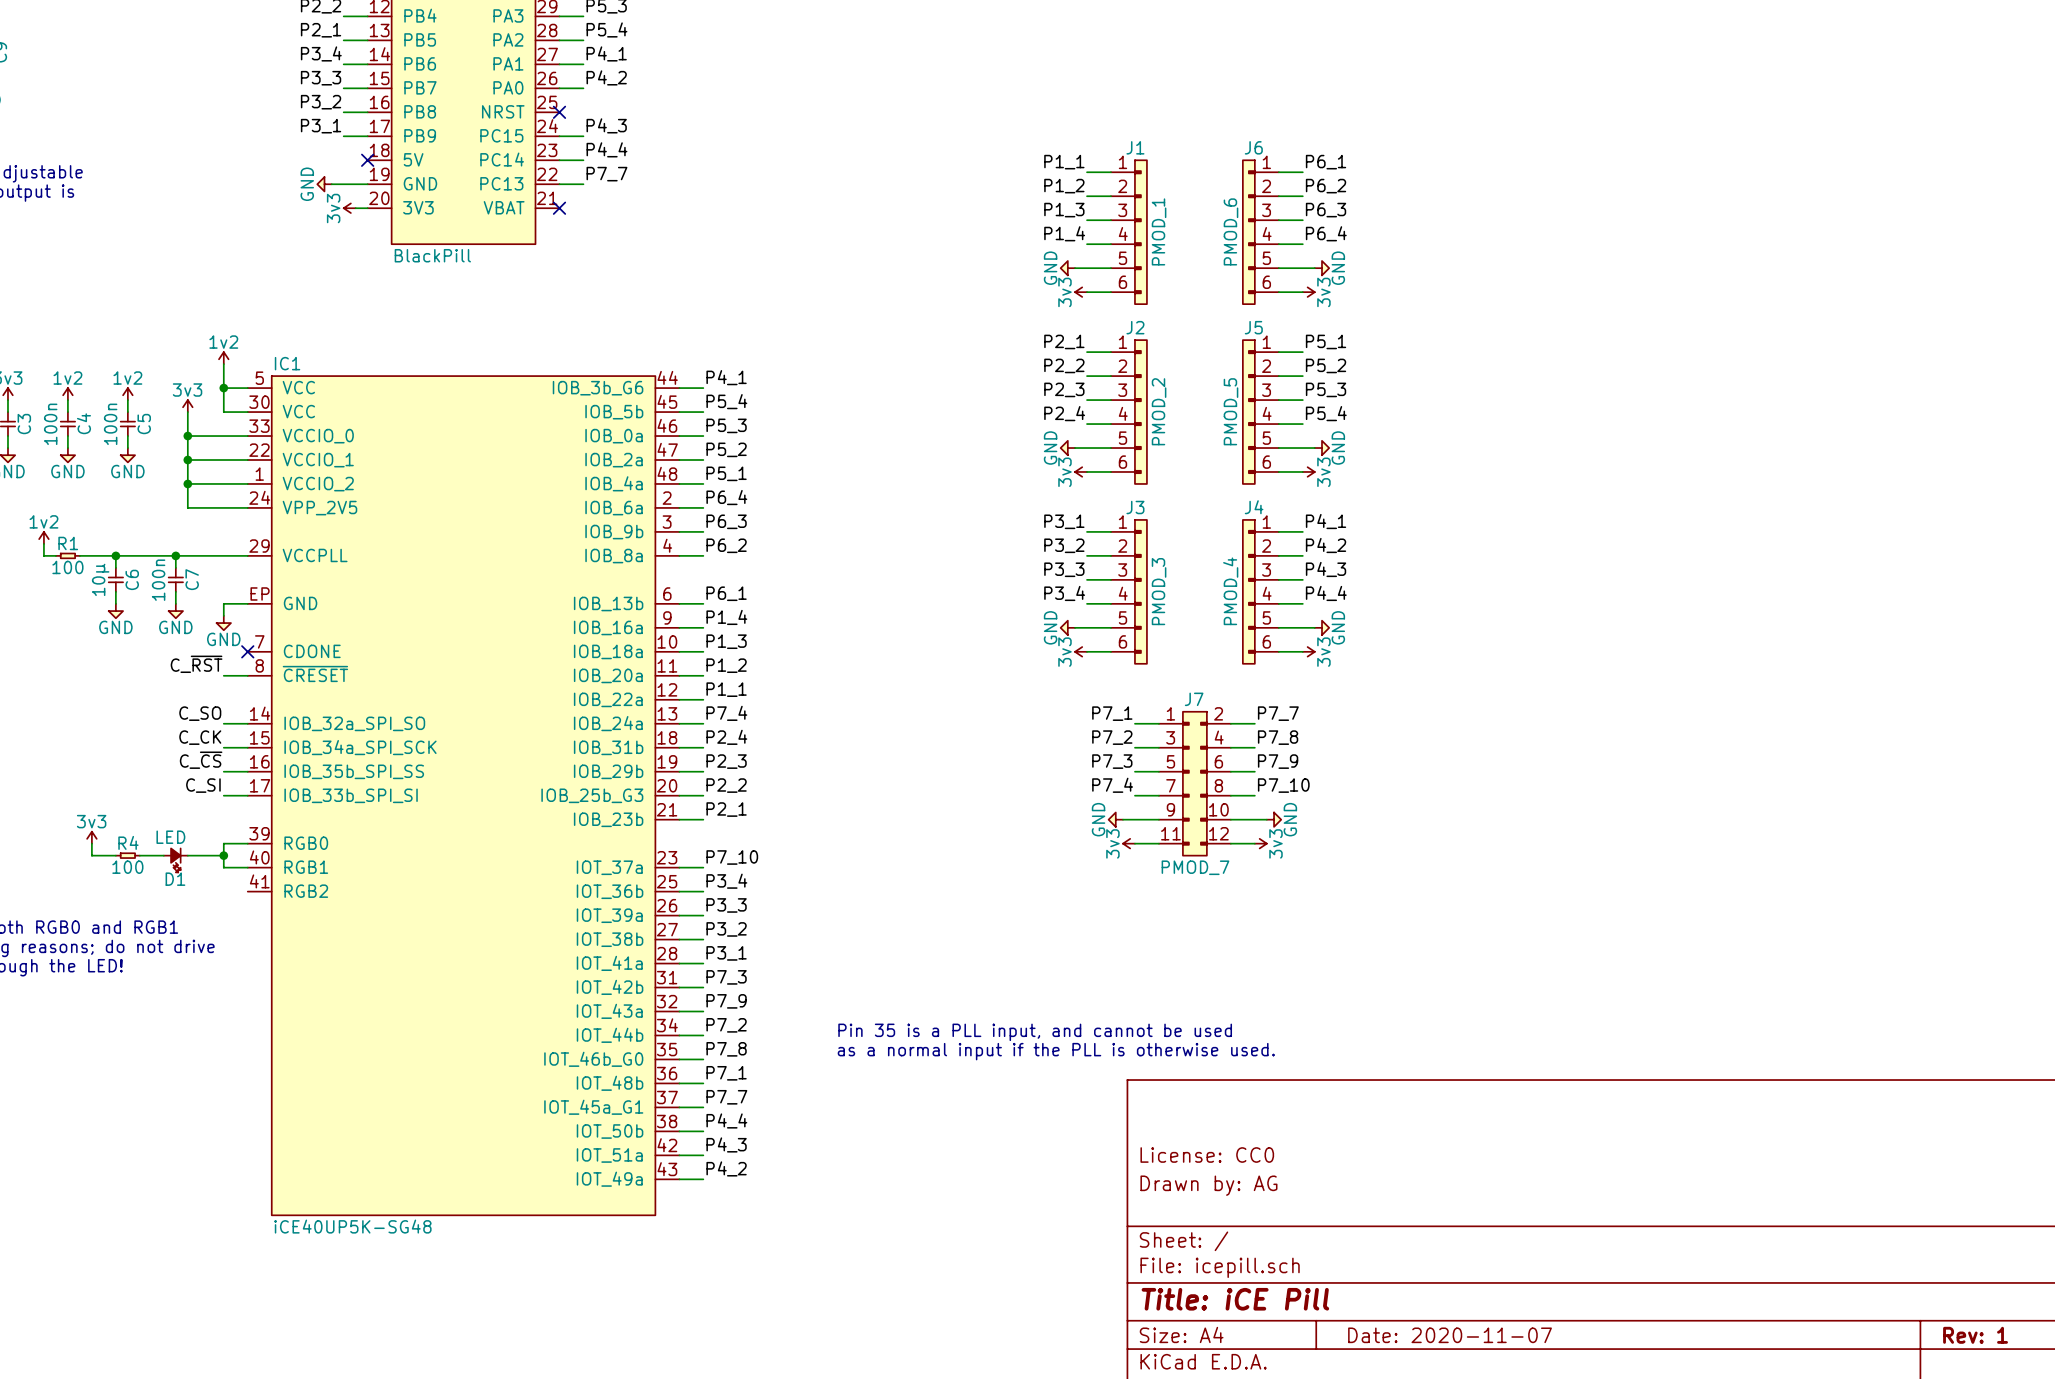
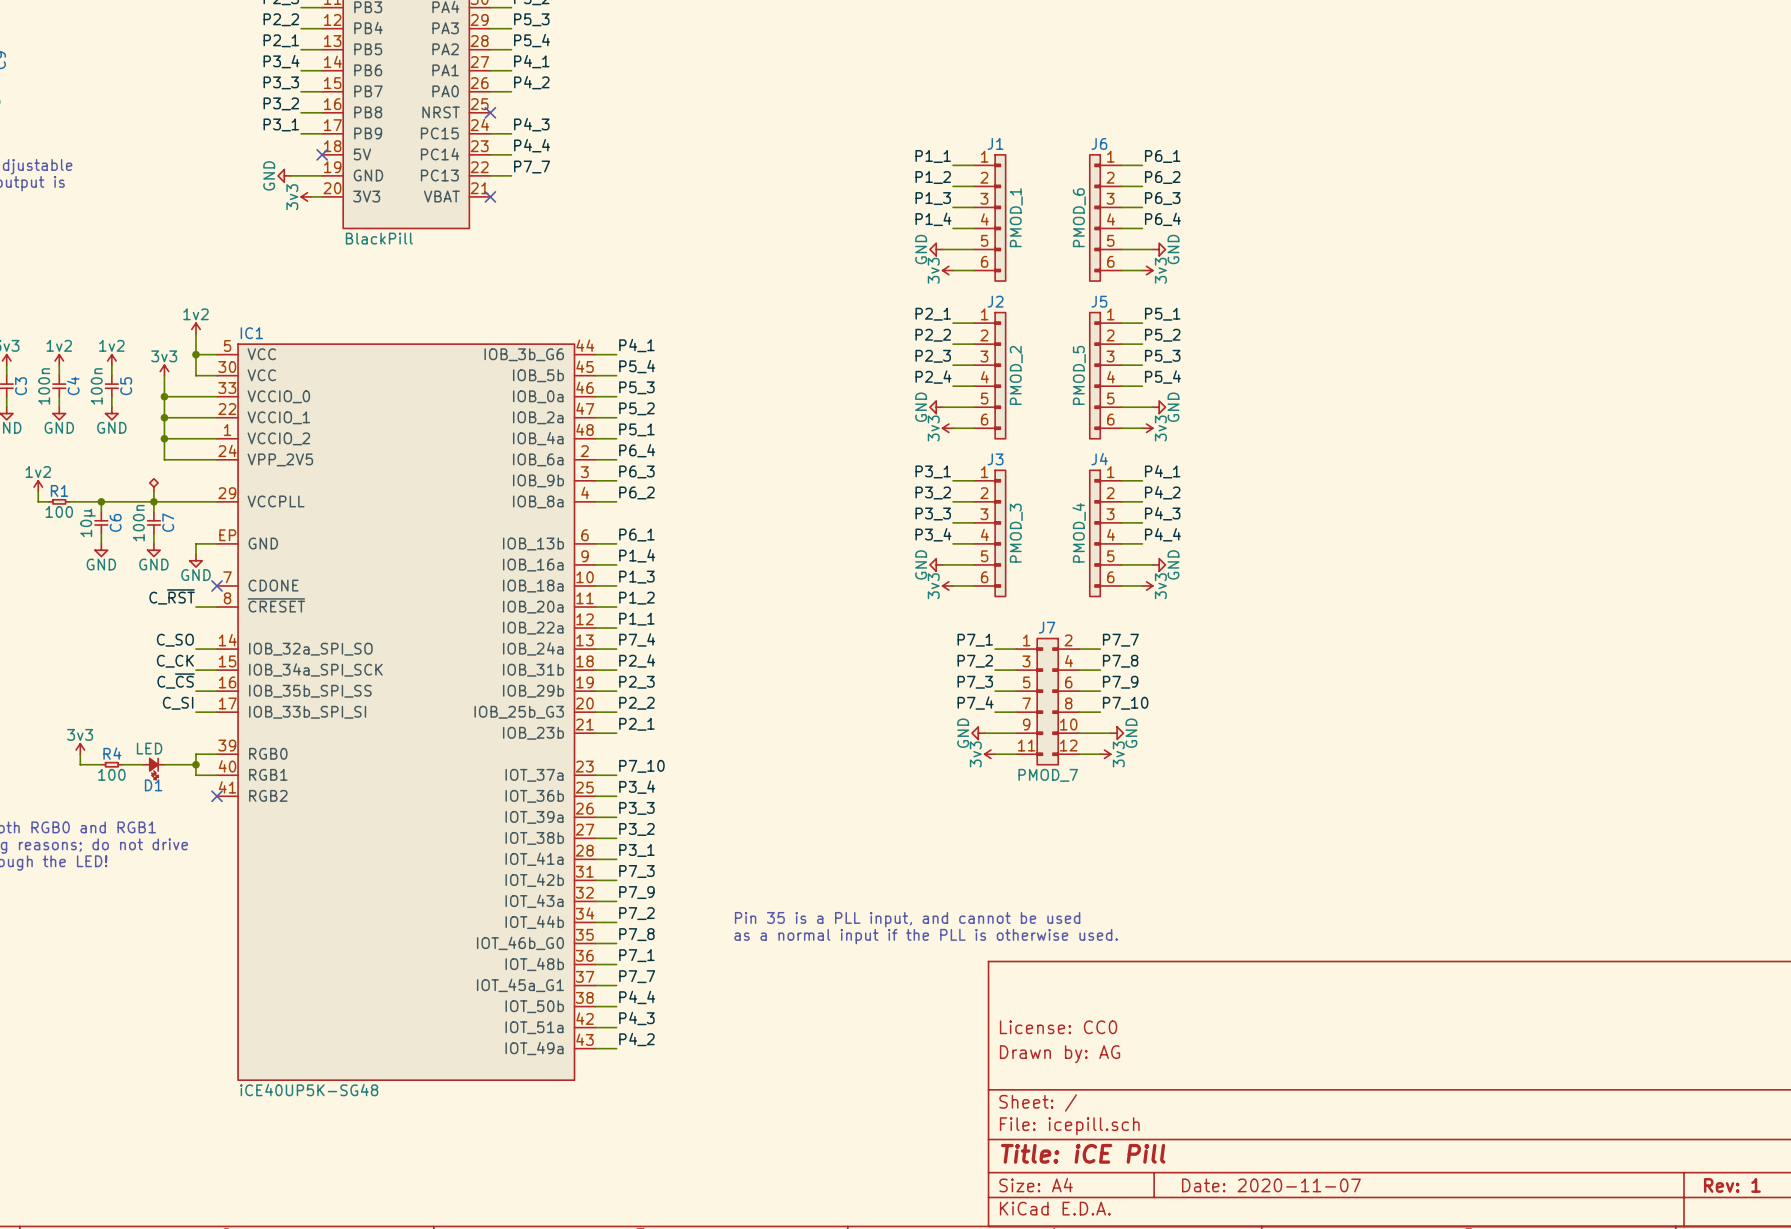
power symbol: none -> (153, 485)
wire: none -> (153, 491) (153, 501)
no-connect mark: none -> (217, 796)

